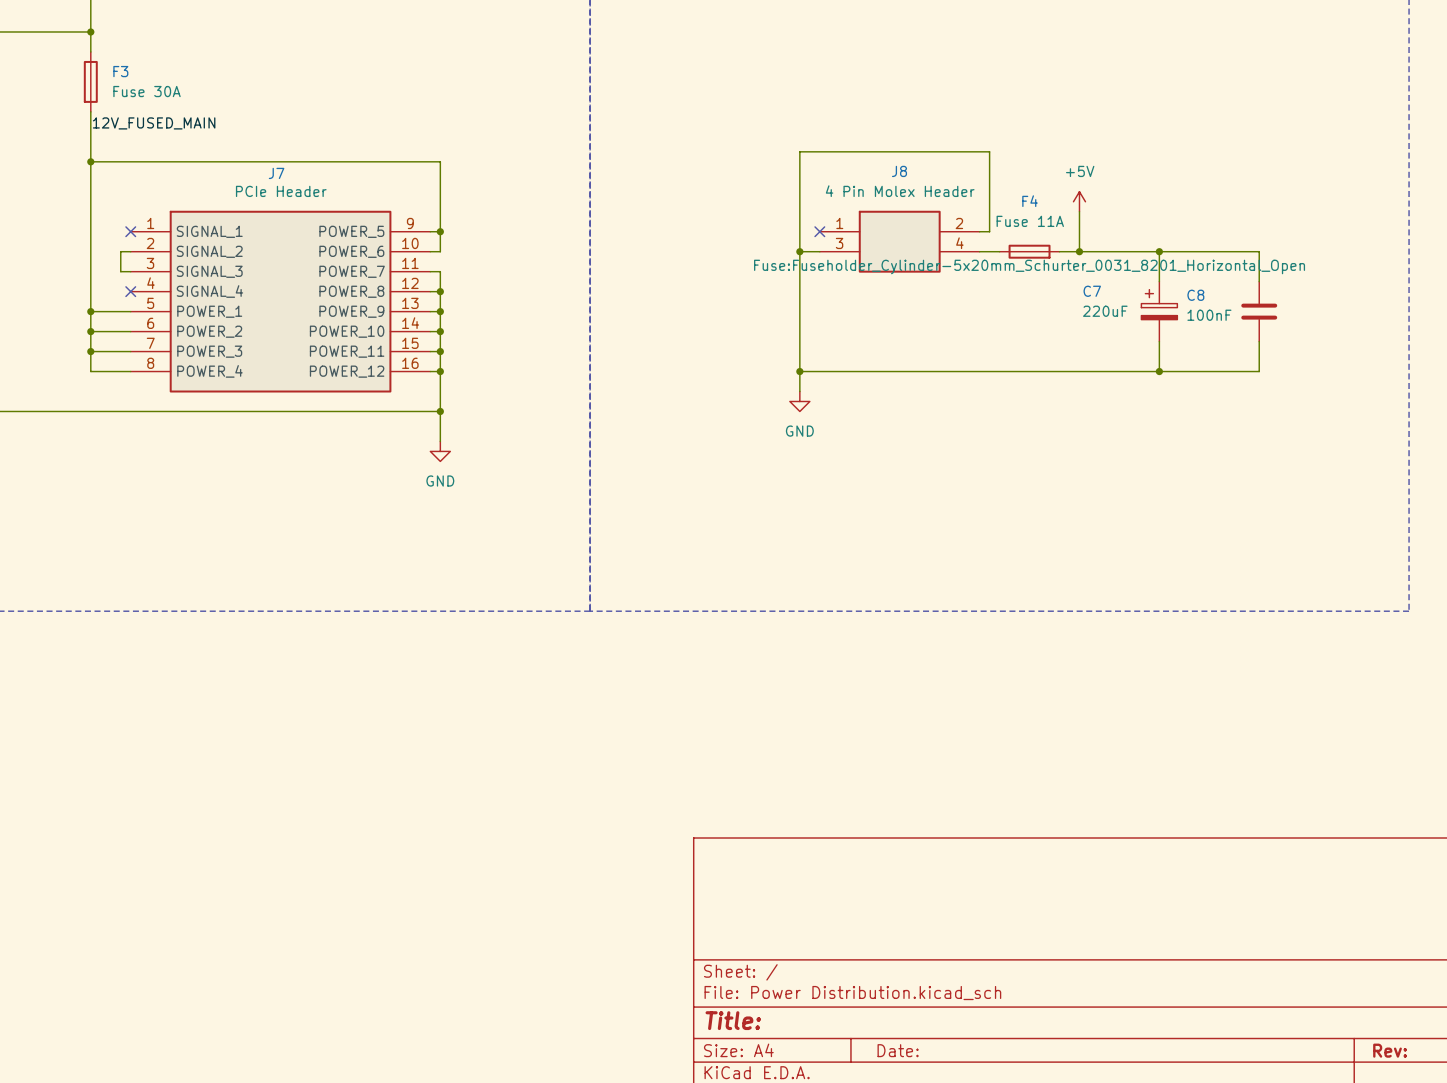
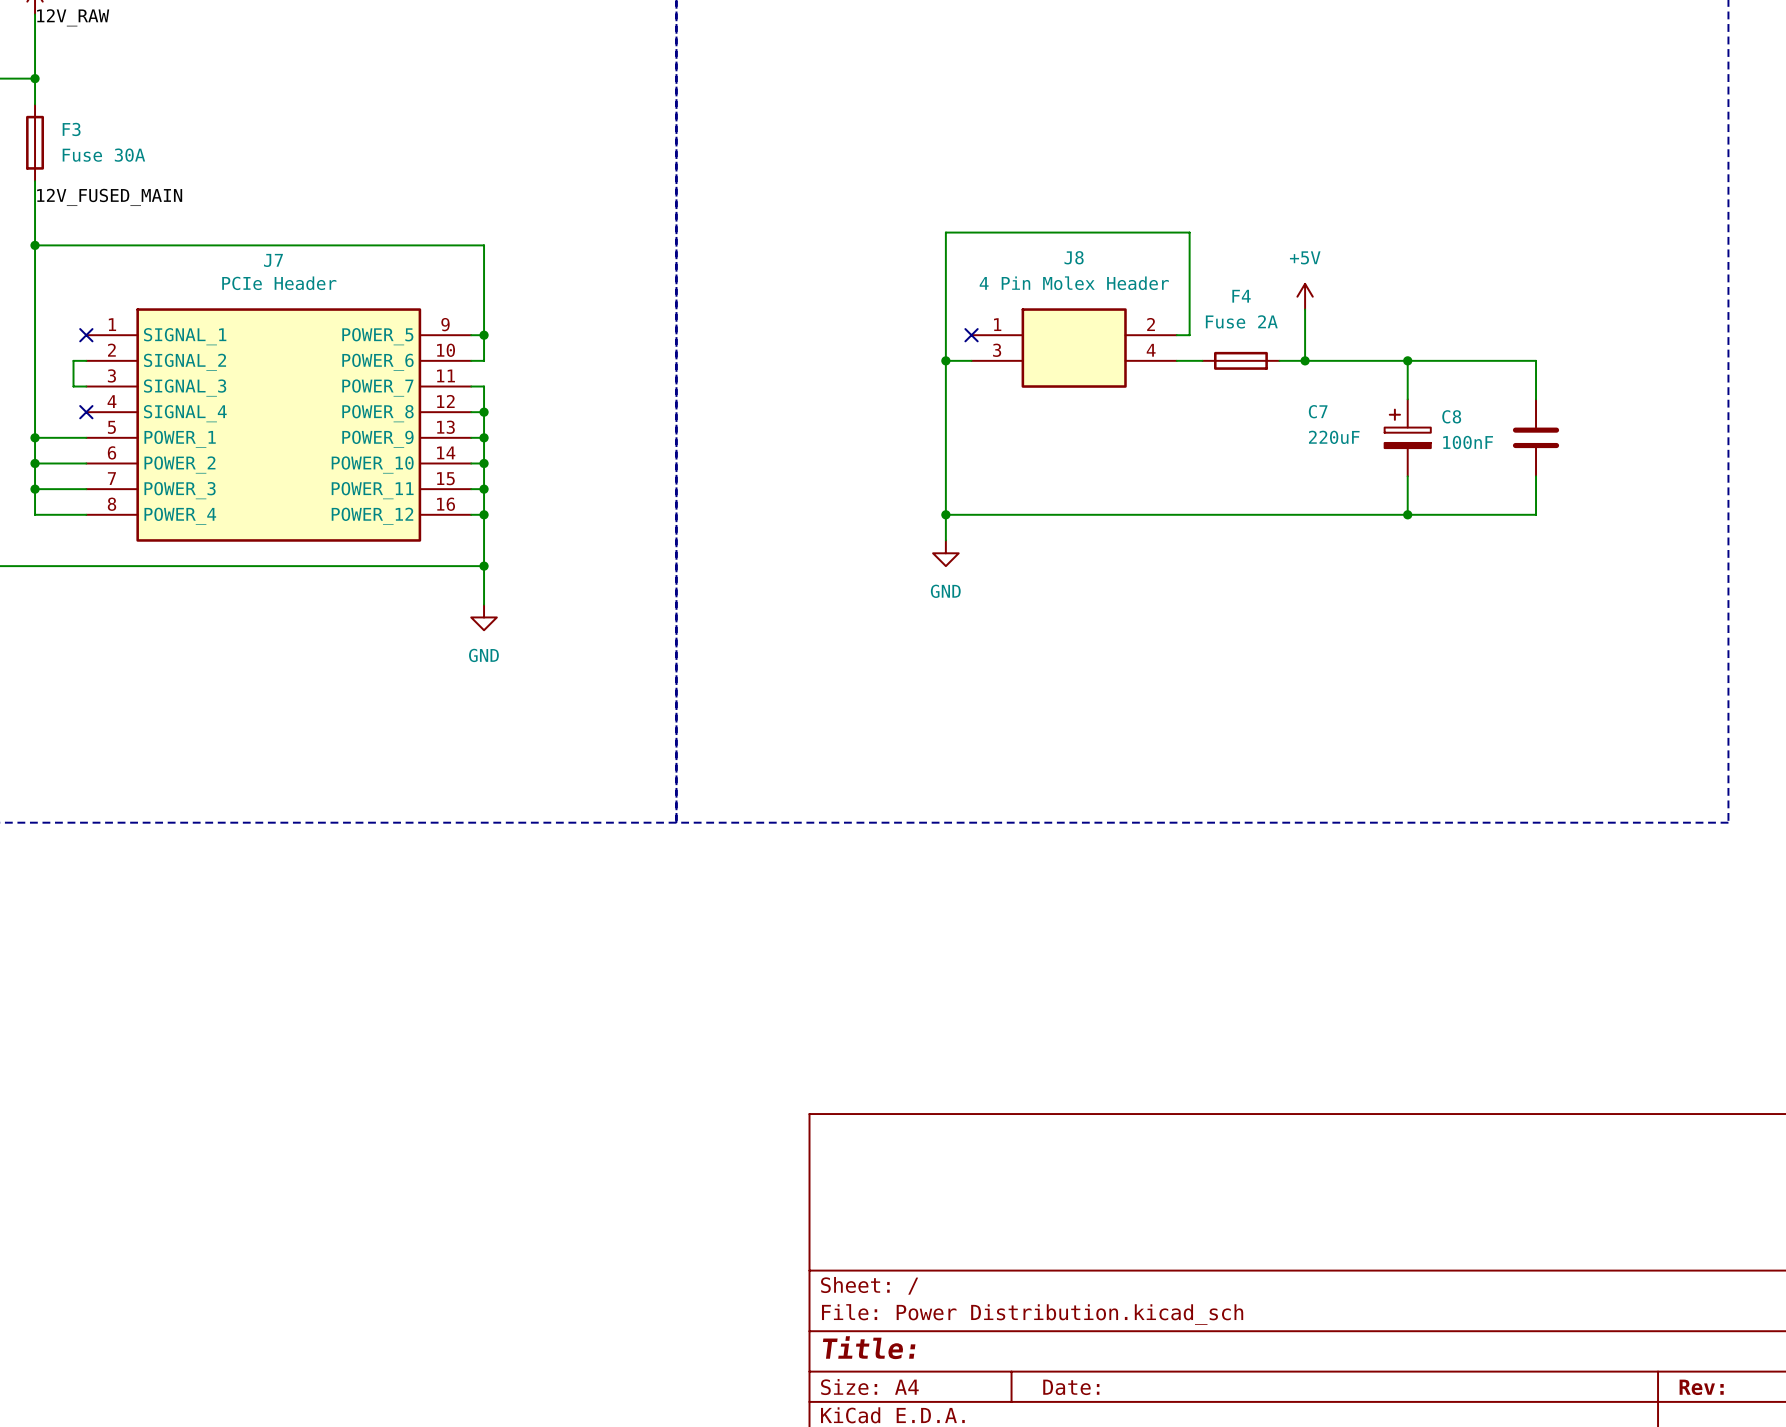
F4 value: Fuse 11A (1030, 221) -> Fuse 2A (1241, 321)
F4 text: Fuse:Fuseholder_Cylinder-5x20mm_Schurter_0031_8201_Horizontal_Open (1029, 266) -> none

